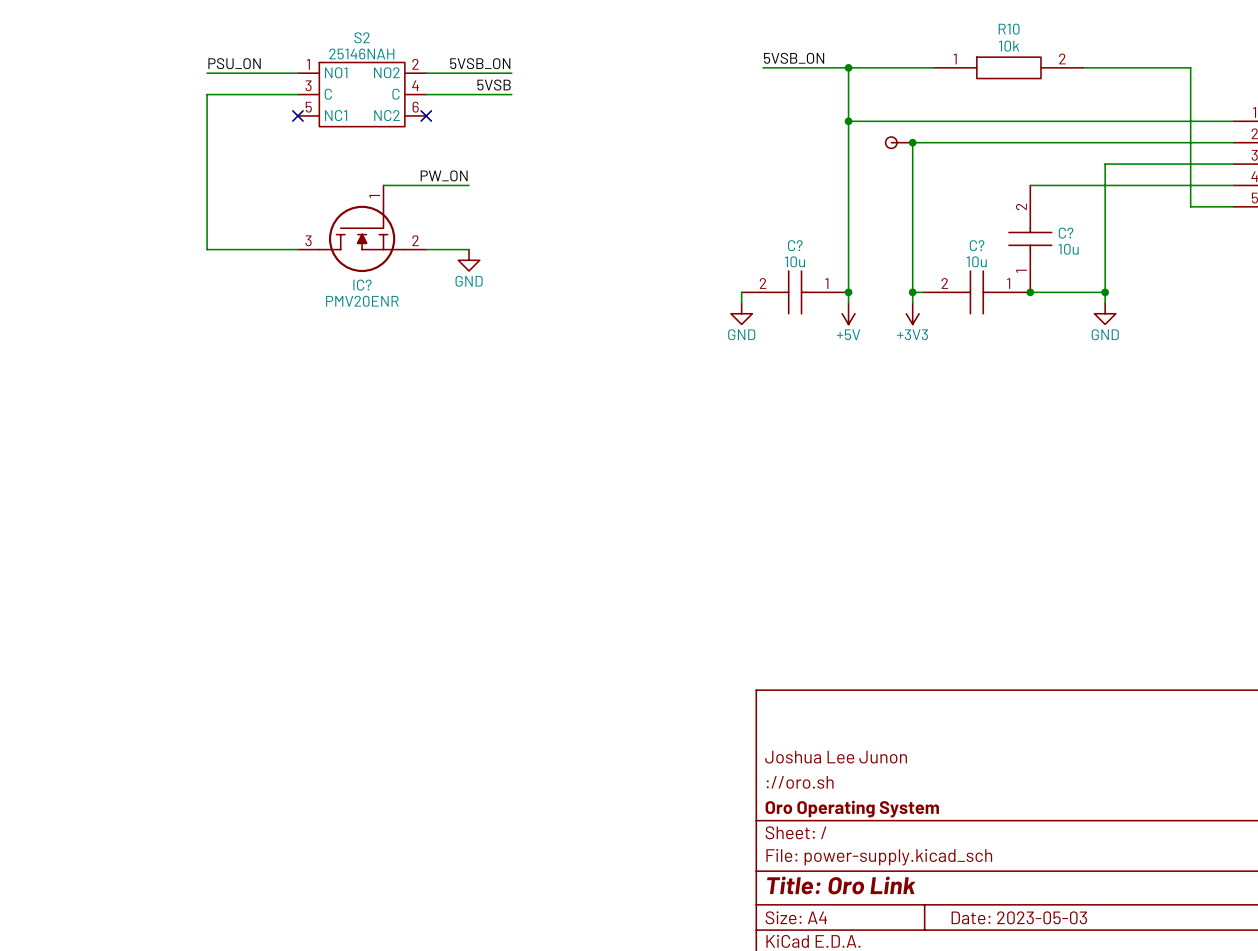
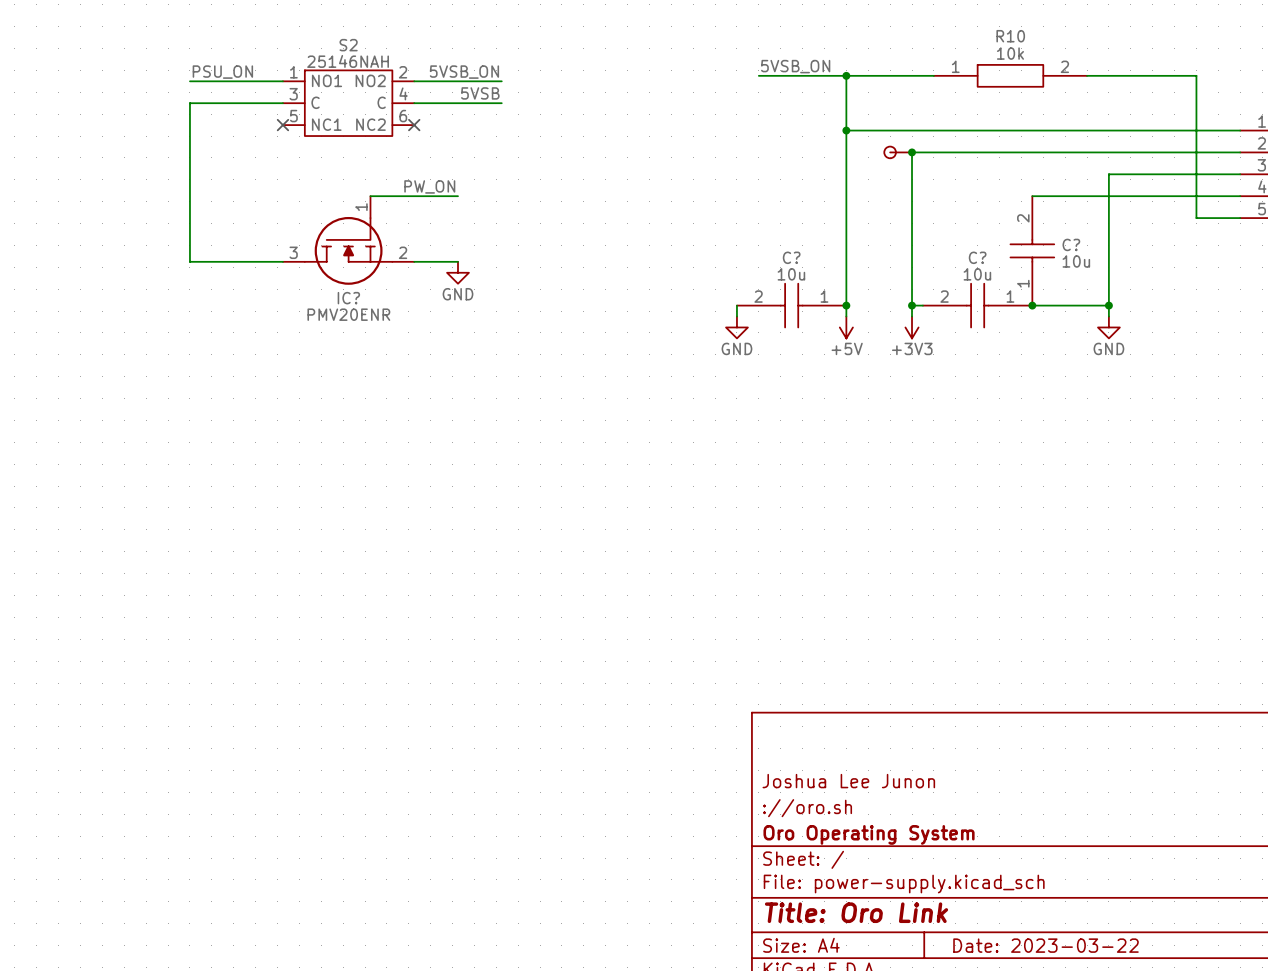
title block: Date: 2023-05-03 (1019, 917) -> Date: 2023-03-22 (1046, 945)

